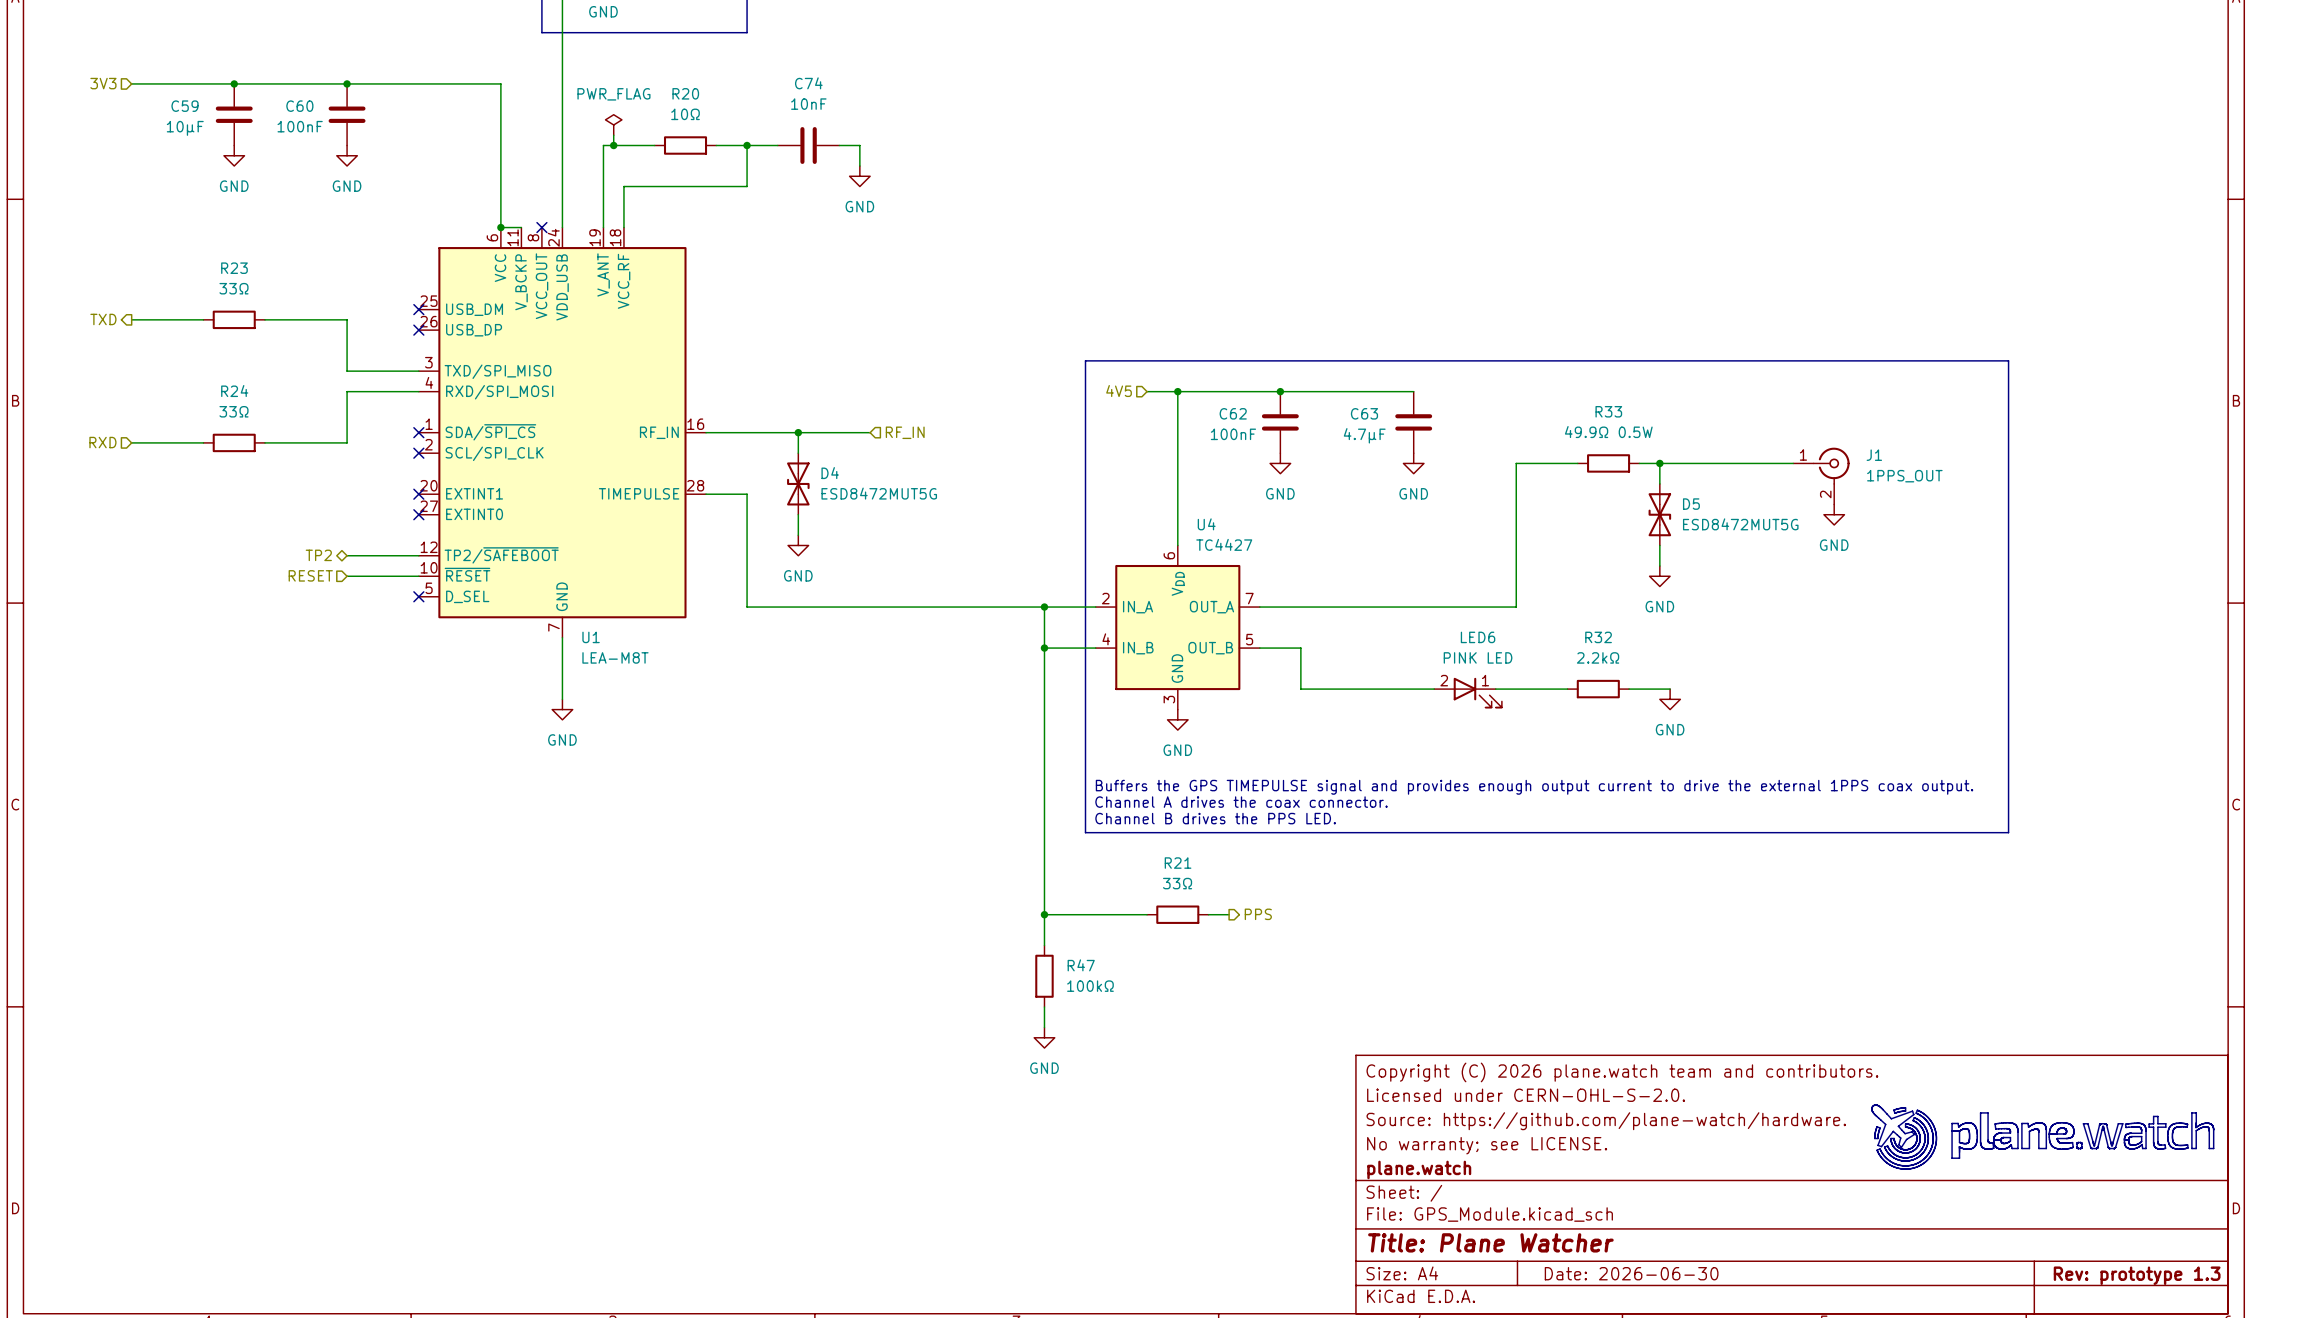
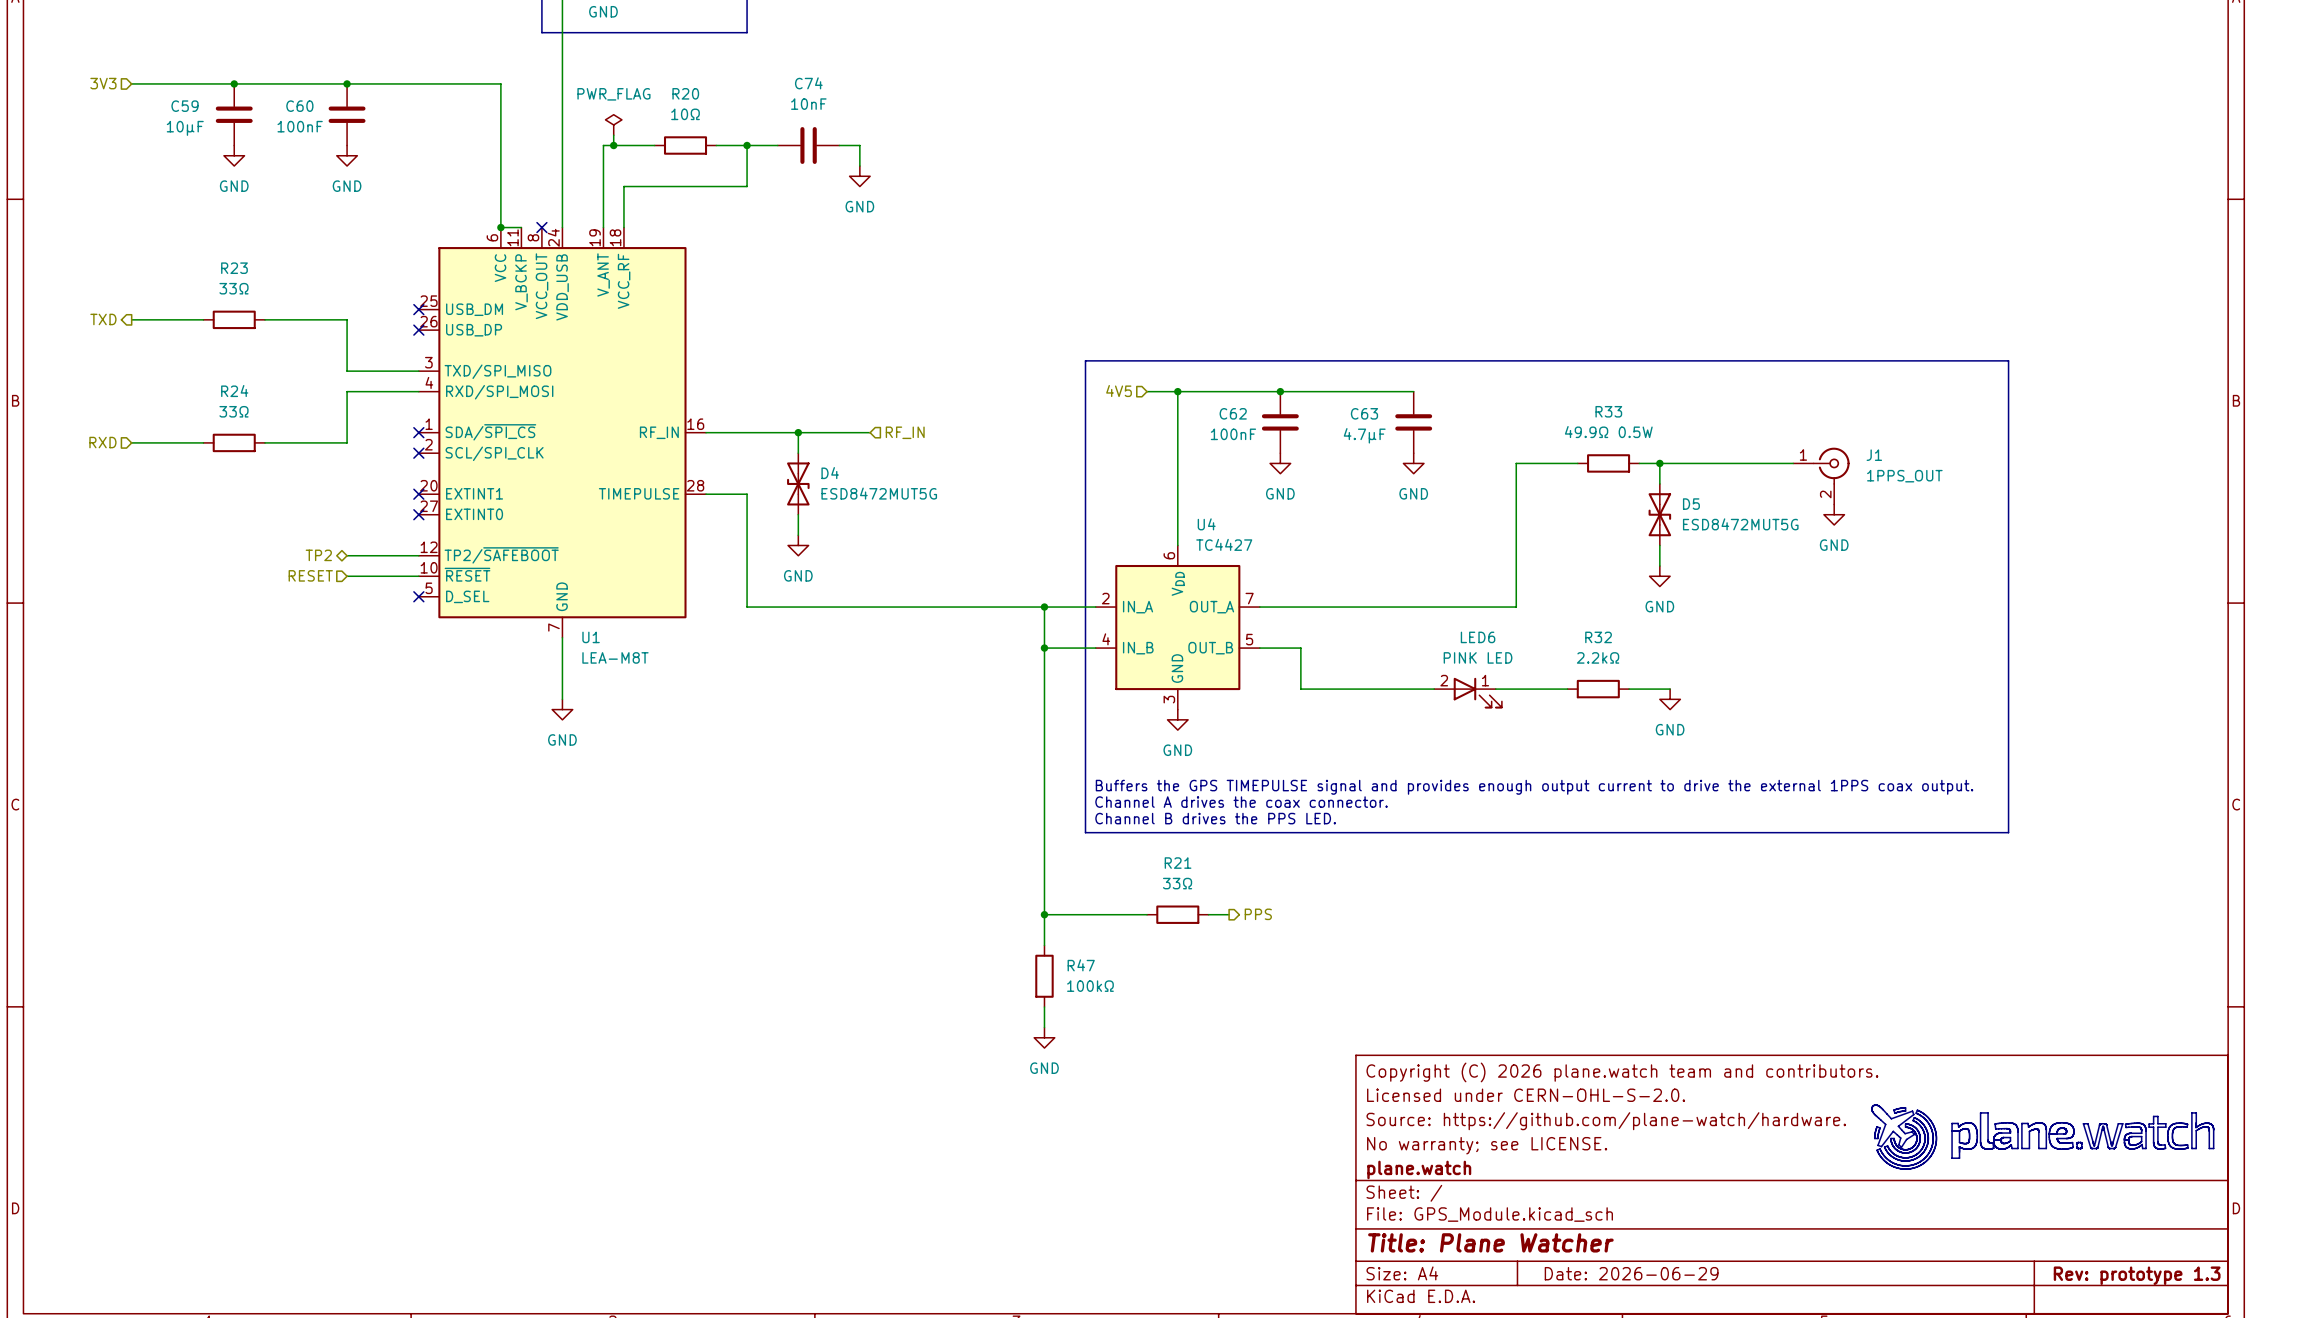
title block: Date: 2026-06-30 (1631, 1273) -> Date: 2026-06-29 (1631, 1273)

